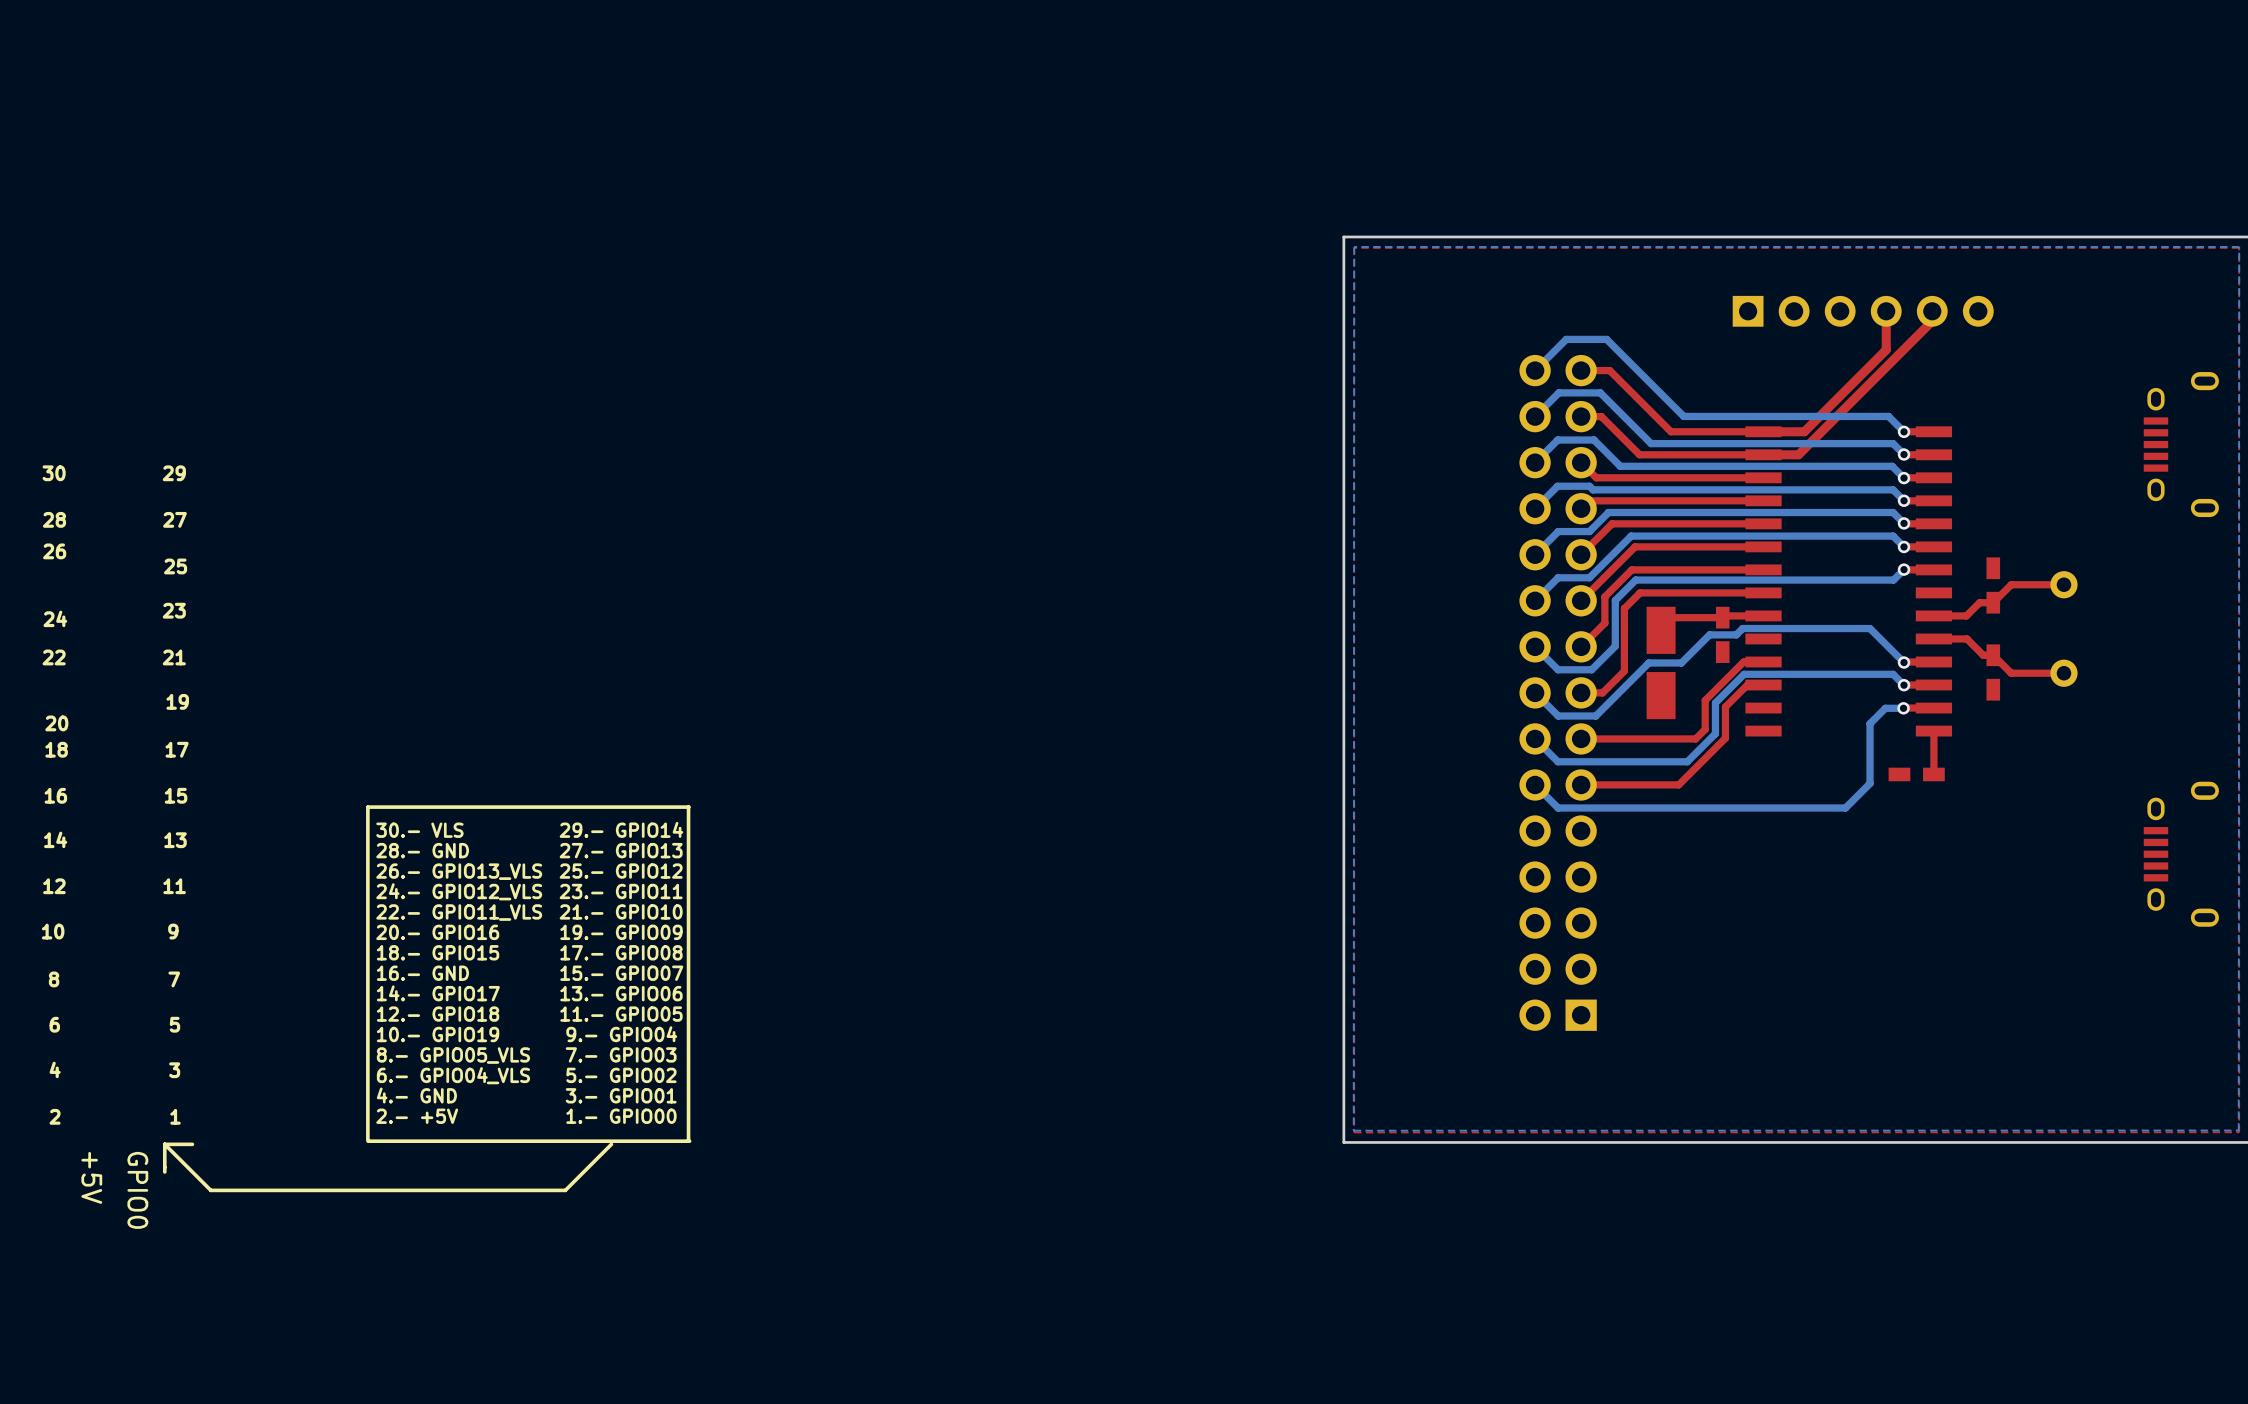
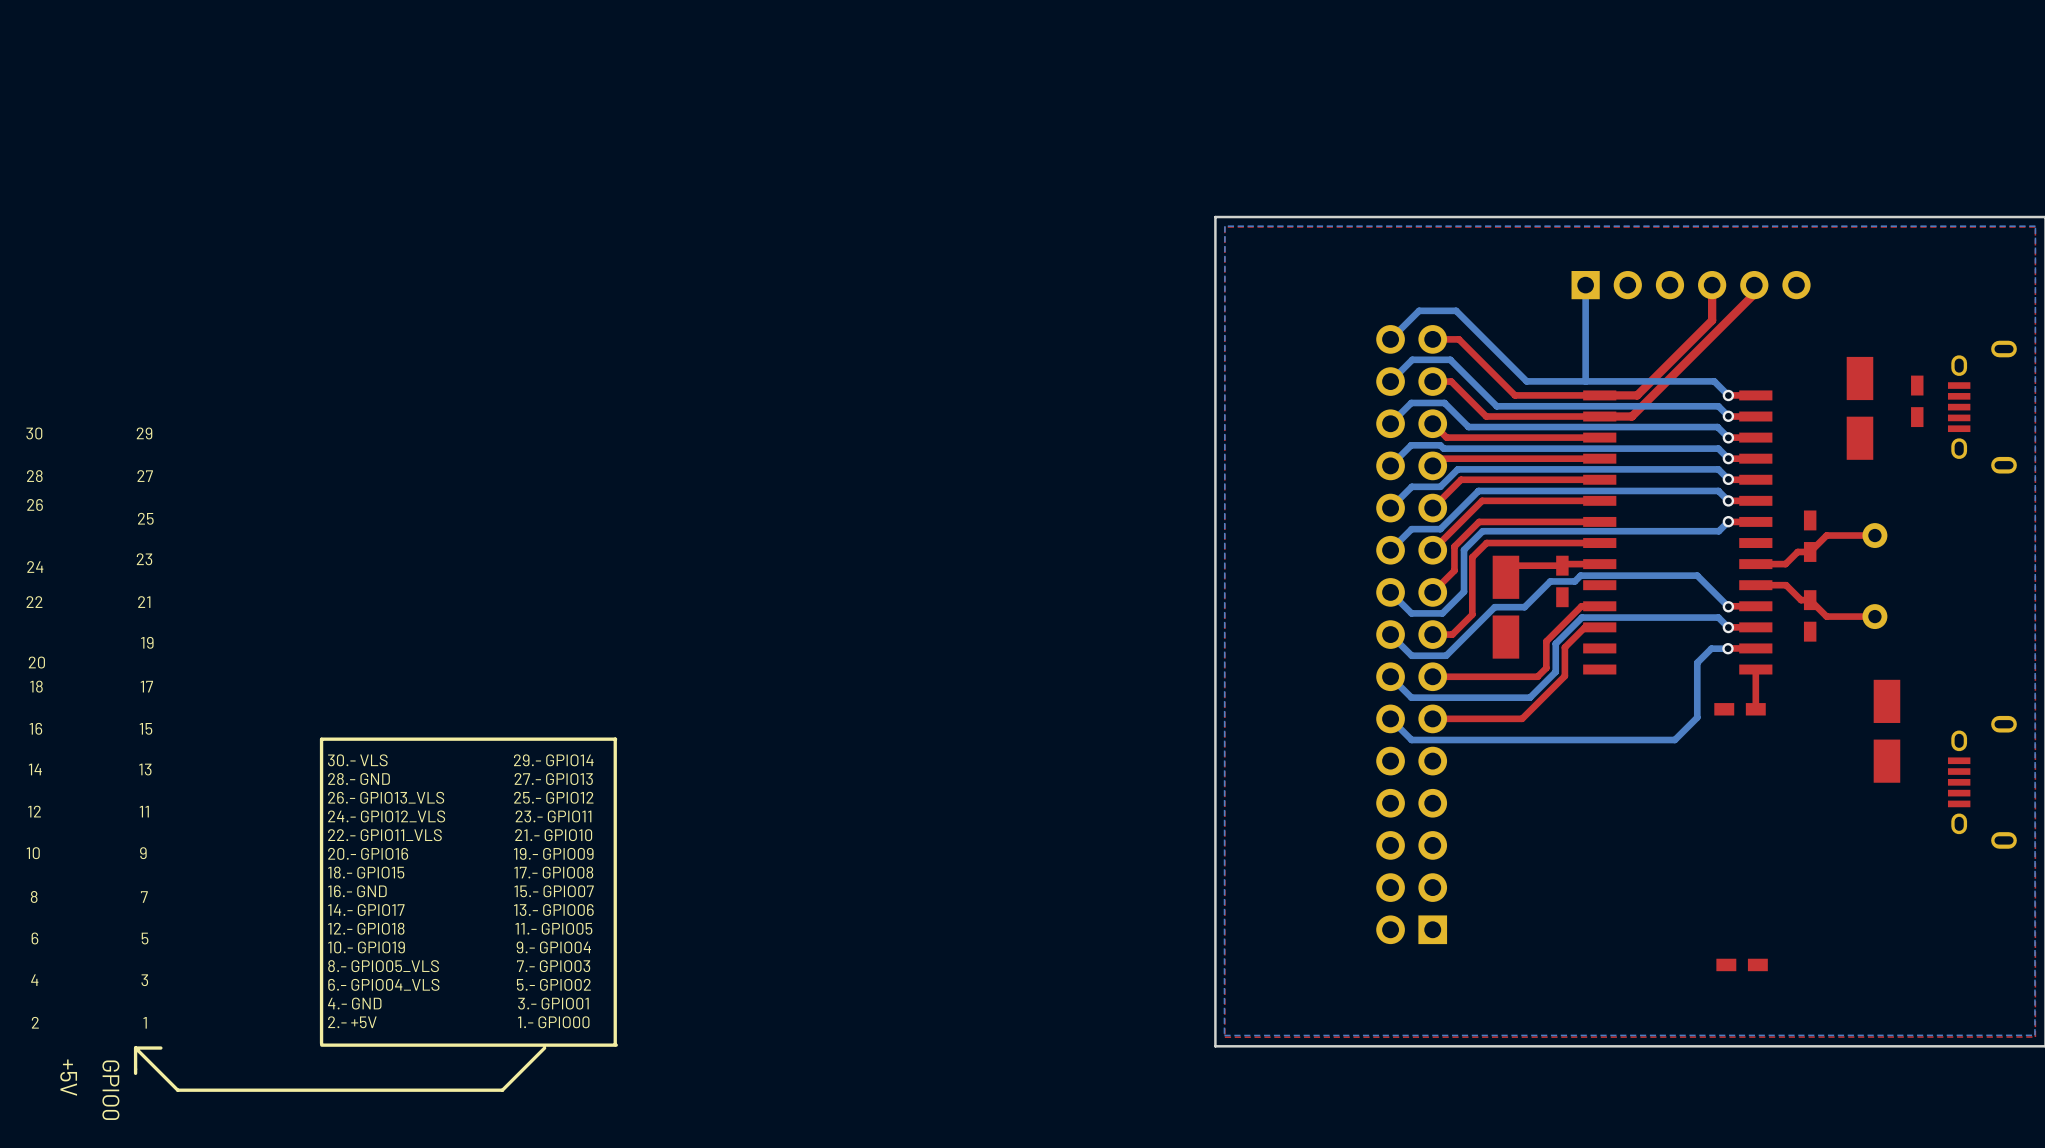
bottom track: none -> (1585, 285) (1585, 381)
part: none -> (1917, 401)
part: none -> (1859, 408)
part: none -> (1886, 731)
part: none -> (1742, 964)

